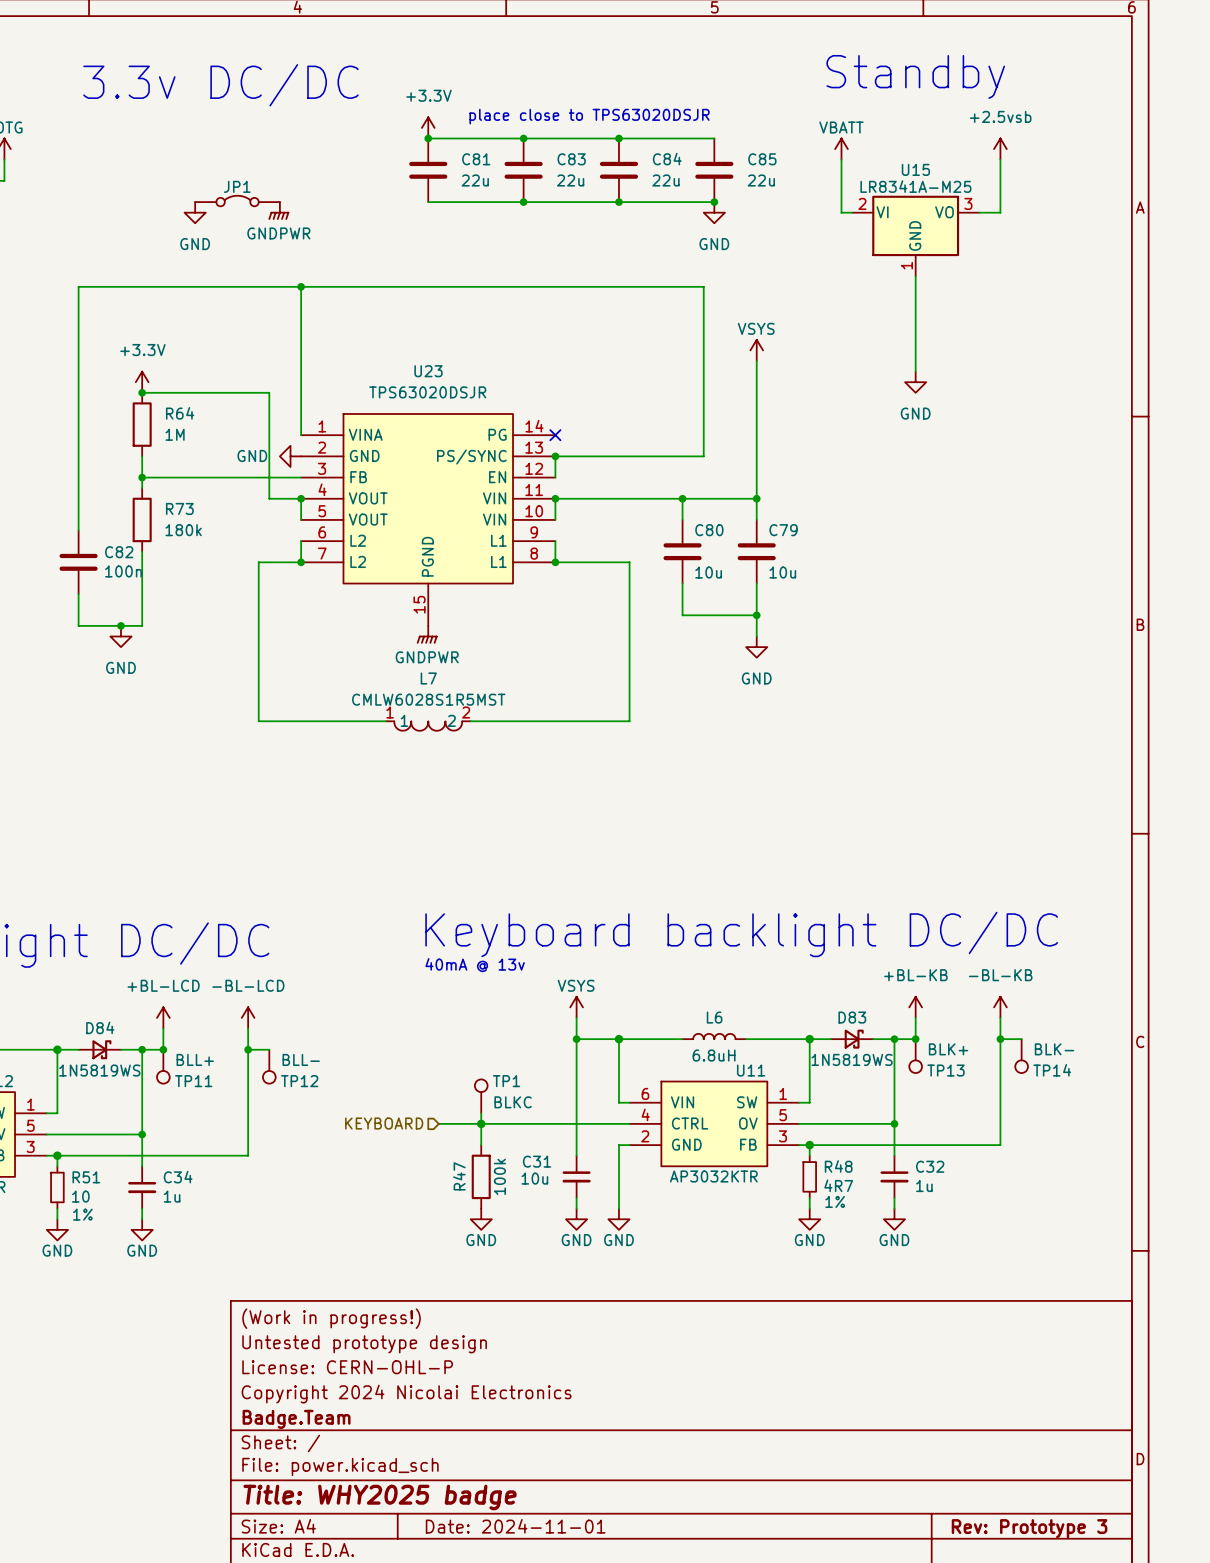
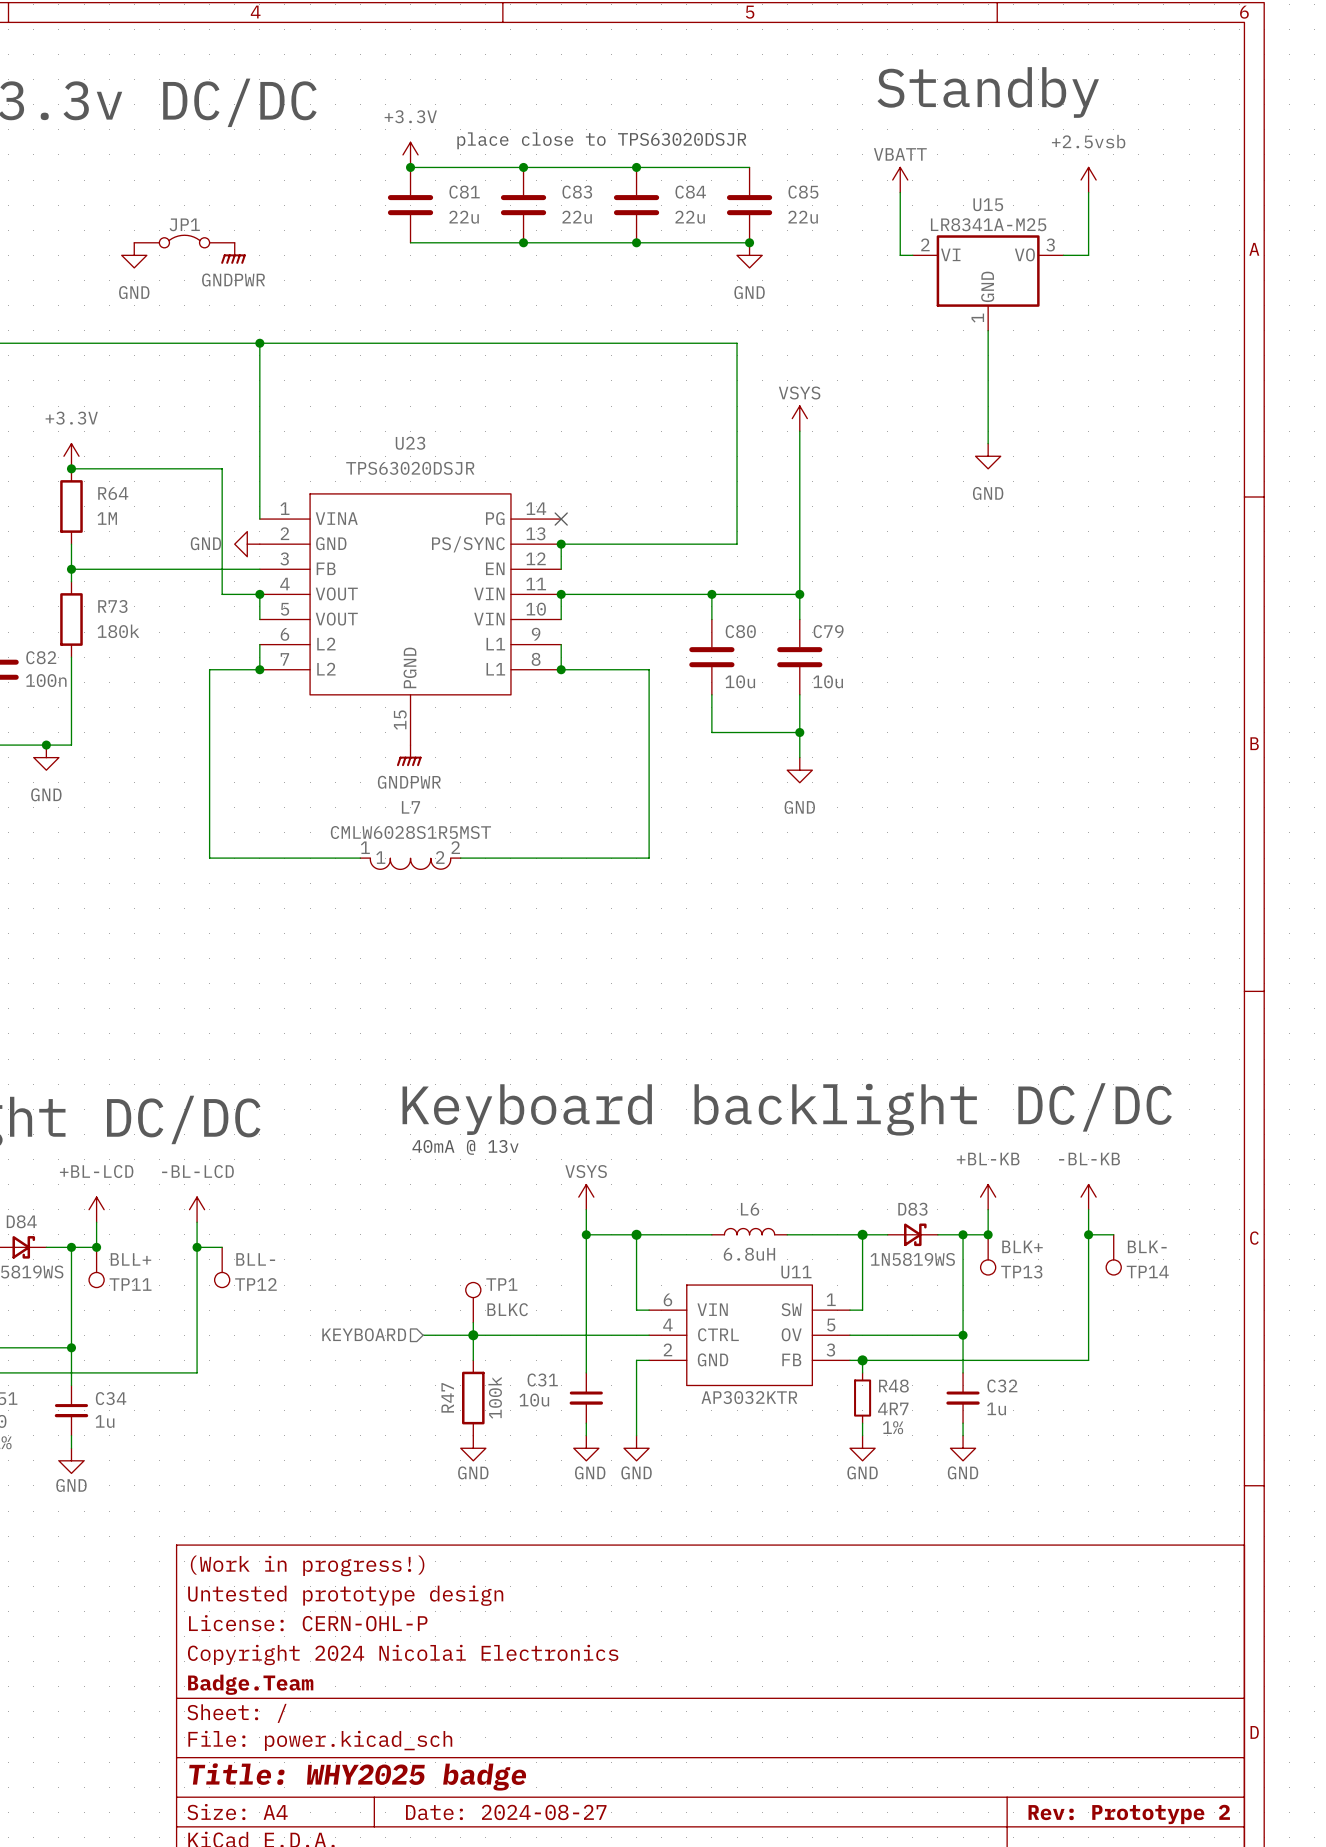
title block: Date: 2024-11-01 (515, 1526) -> Date: 2024-08-27 (506, 1812)
title block: Rev: Prototype 3 (1029, 1528) -> Rev: Prototype 2 (1129, 1814)

